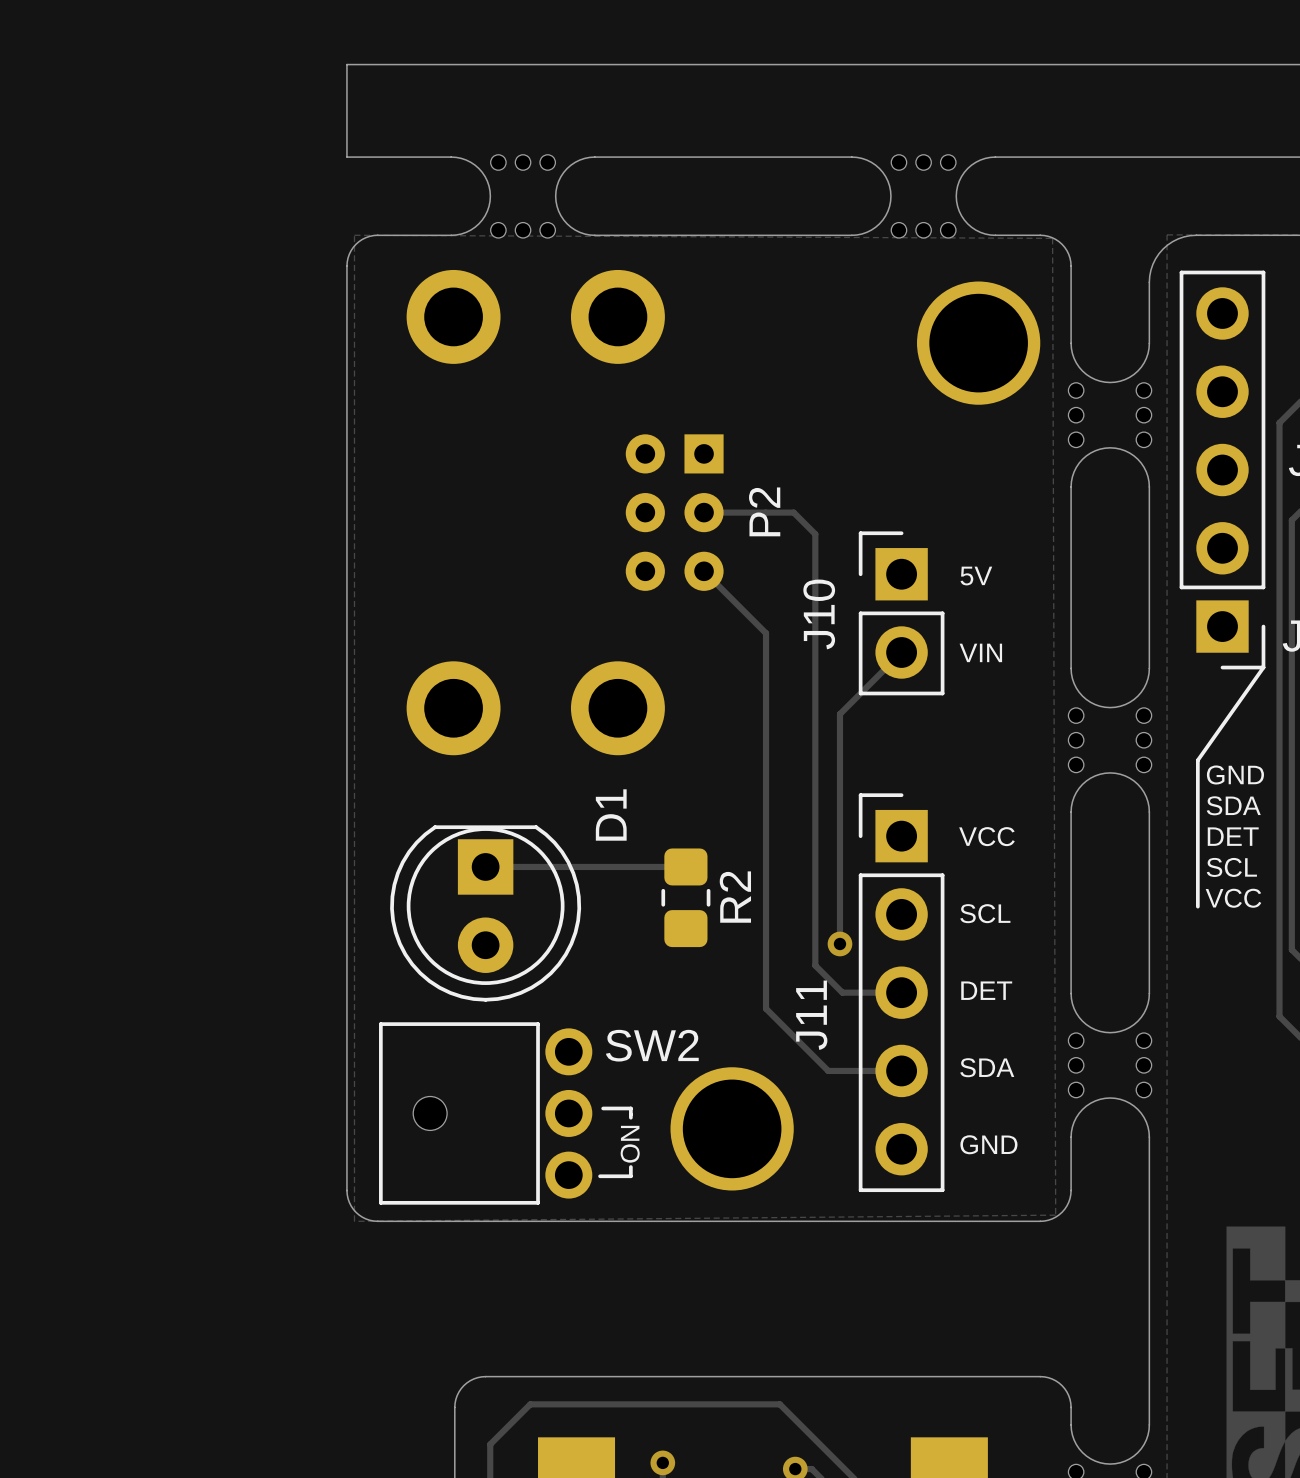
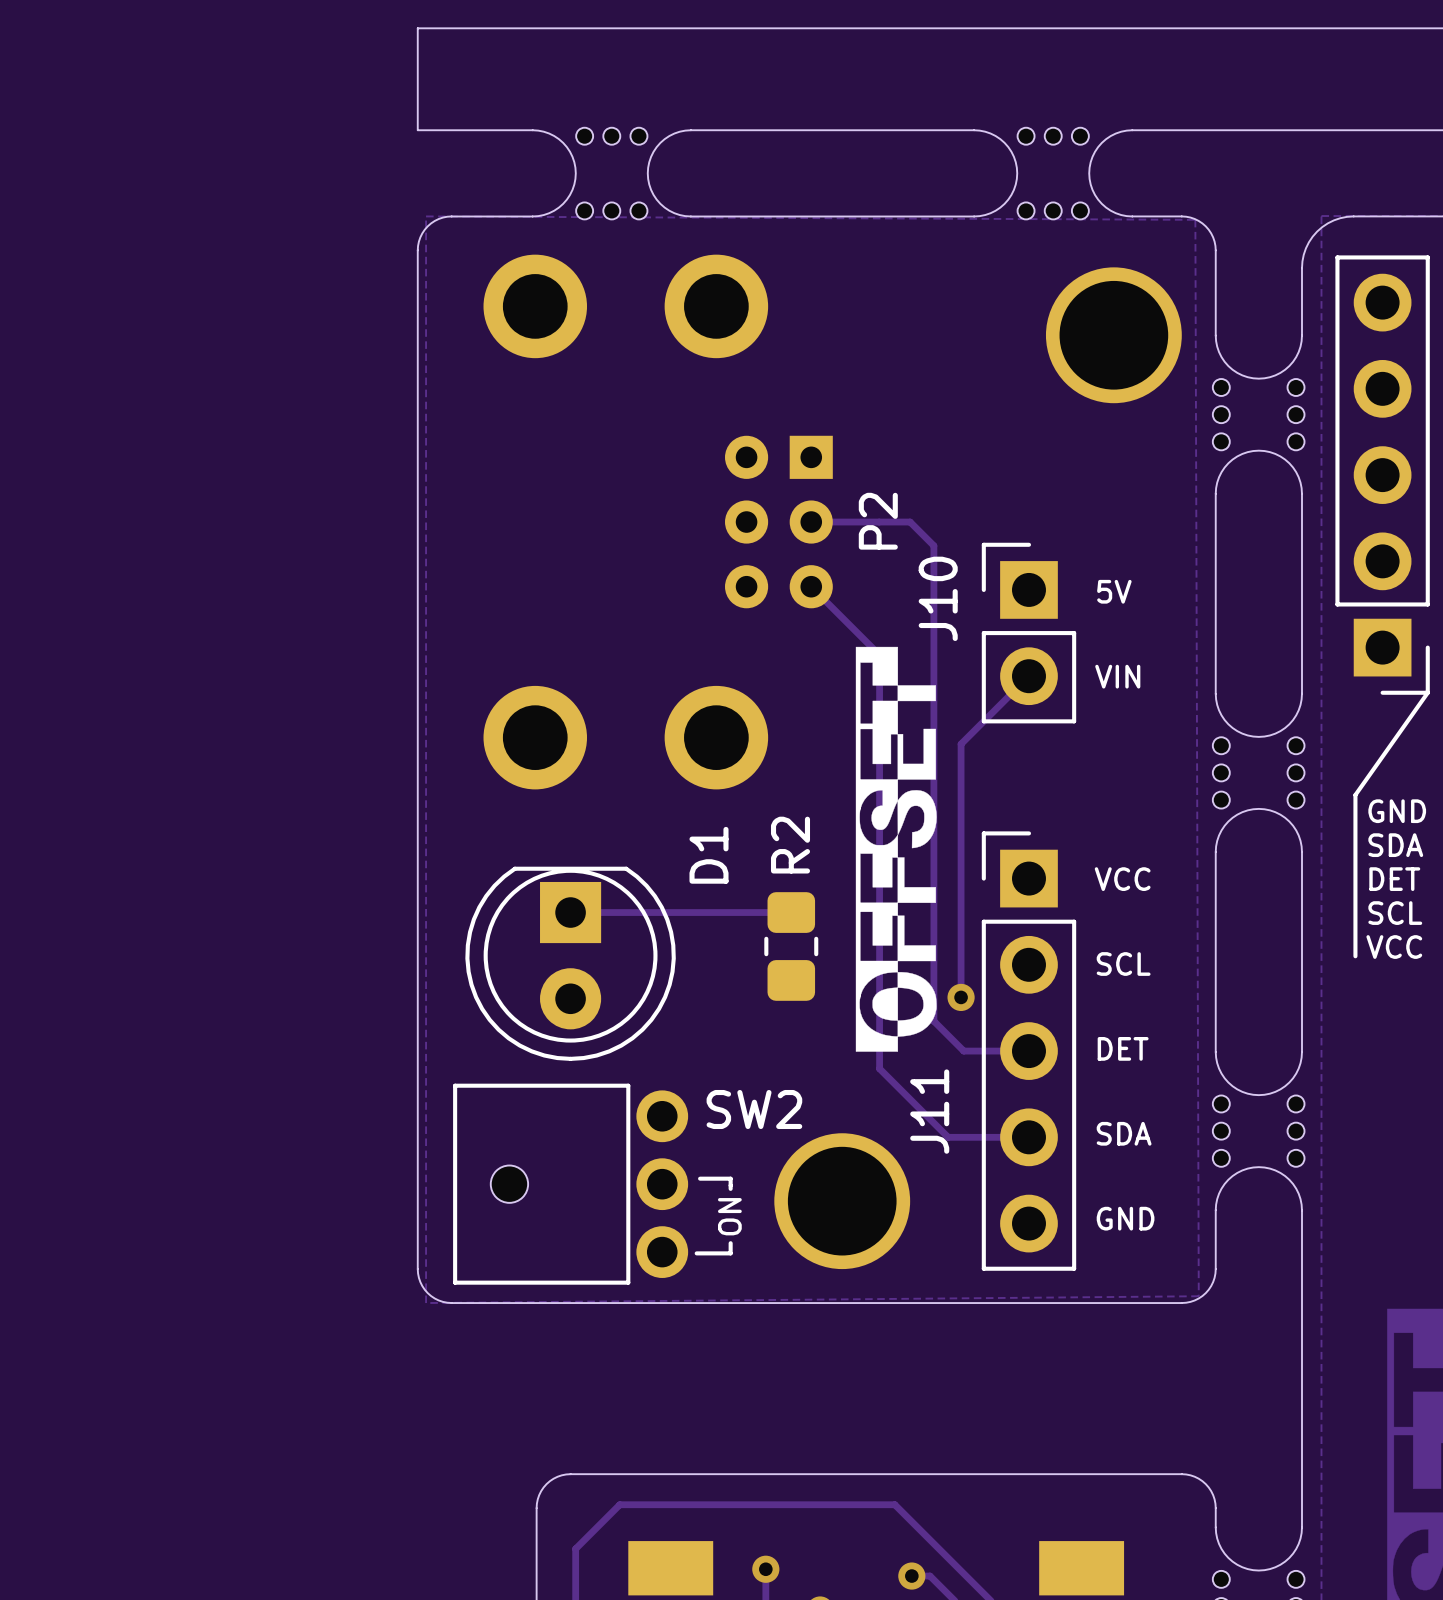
J10 name position: J10 (819, 614) -> J10 (938, 598)
drawing: none -> [855, 646, 937, 1052]
R2 name position: R2 (735, 897) -> R2 (790, 845)
J11 name position: J11 (811, 1015) -> J11 (929, 1111)

